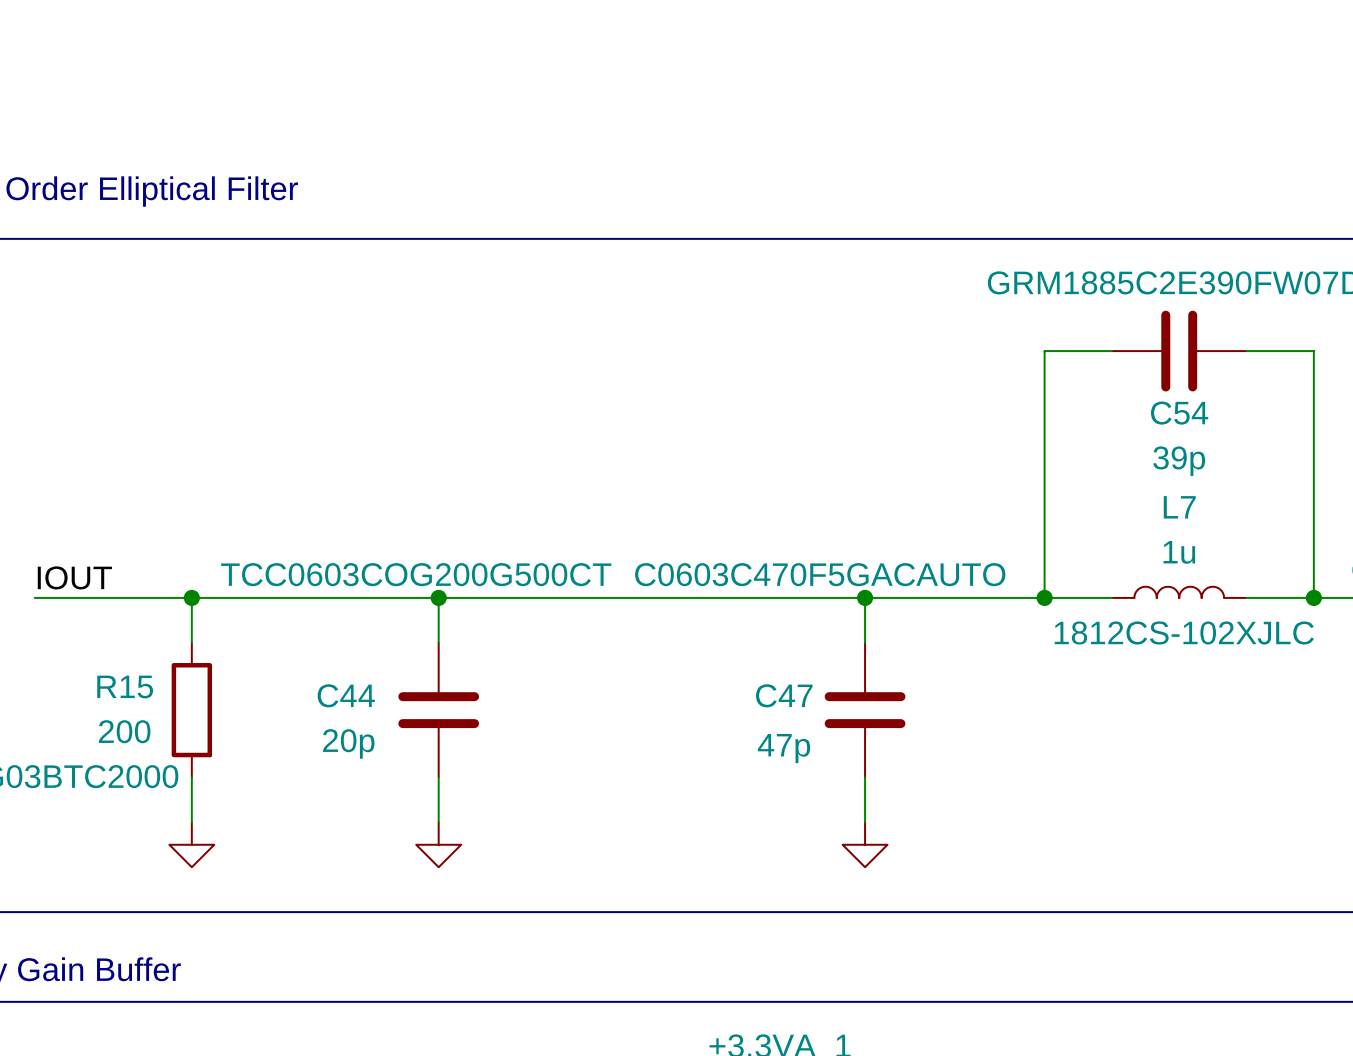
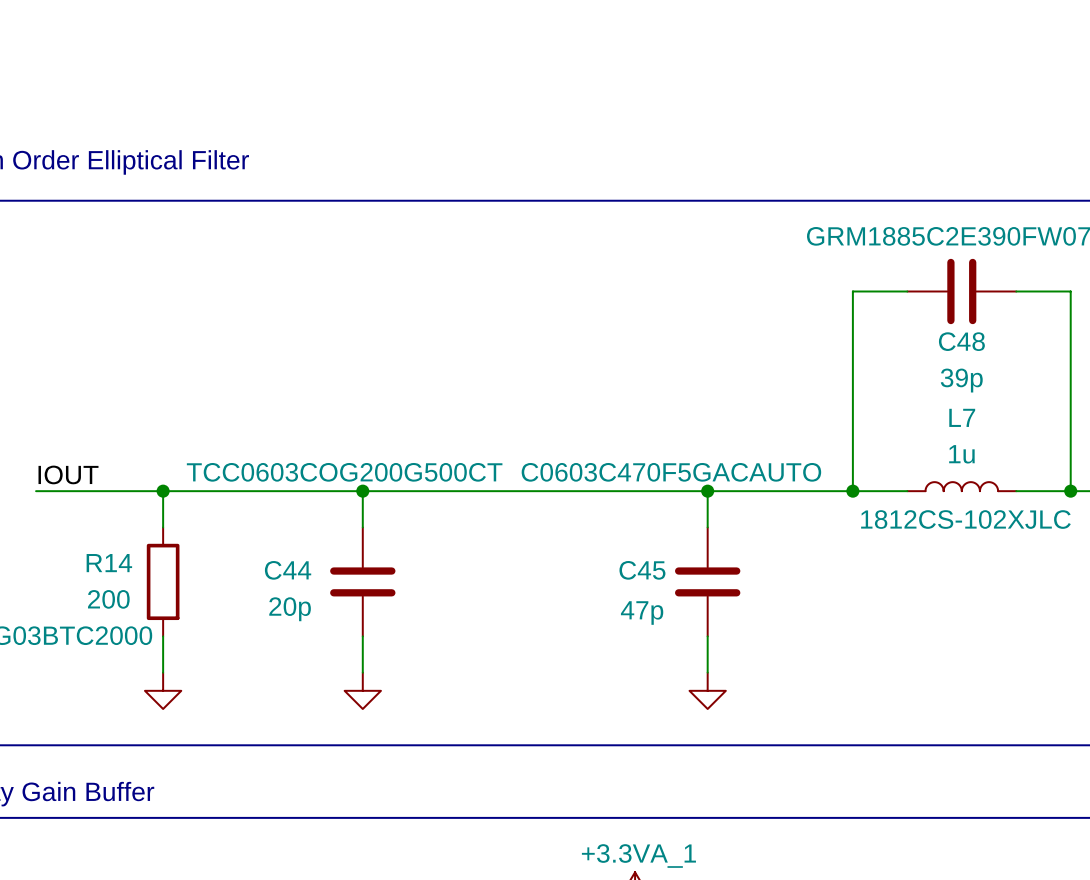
C54 name: C54 (1179, 413) -> C48 (961, 341)
R15 name: R15 (125, 687) -> R14 (109, 563)
C47 name: C47 (784, 695) -> C45 (642, 570)

